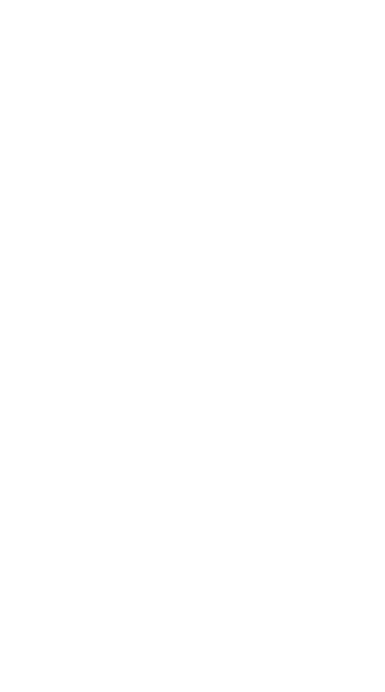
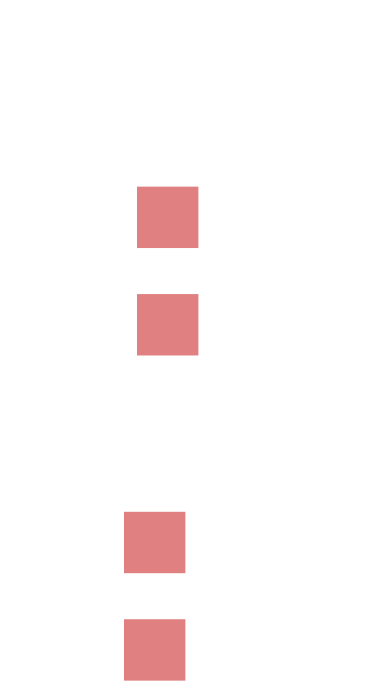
part: none -> (167, 271)
part: none -> (154, 596)

